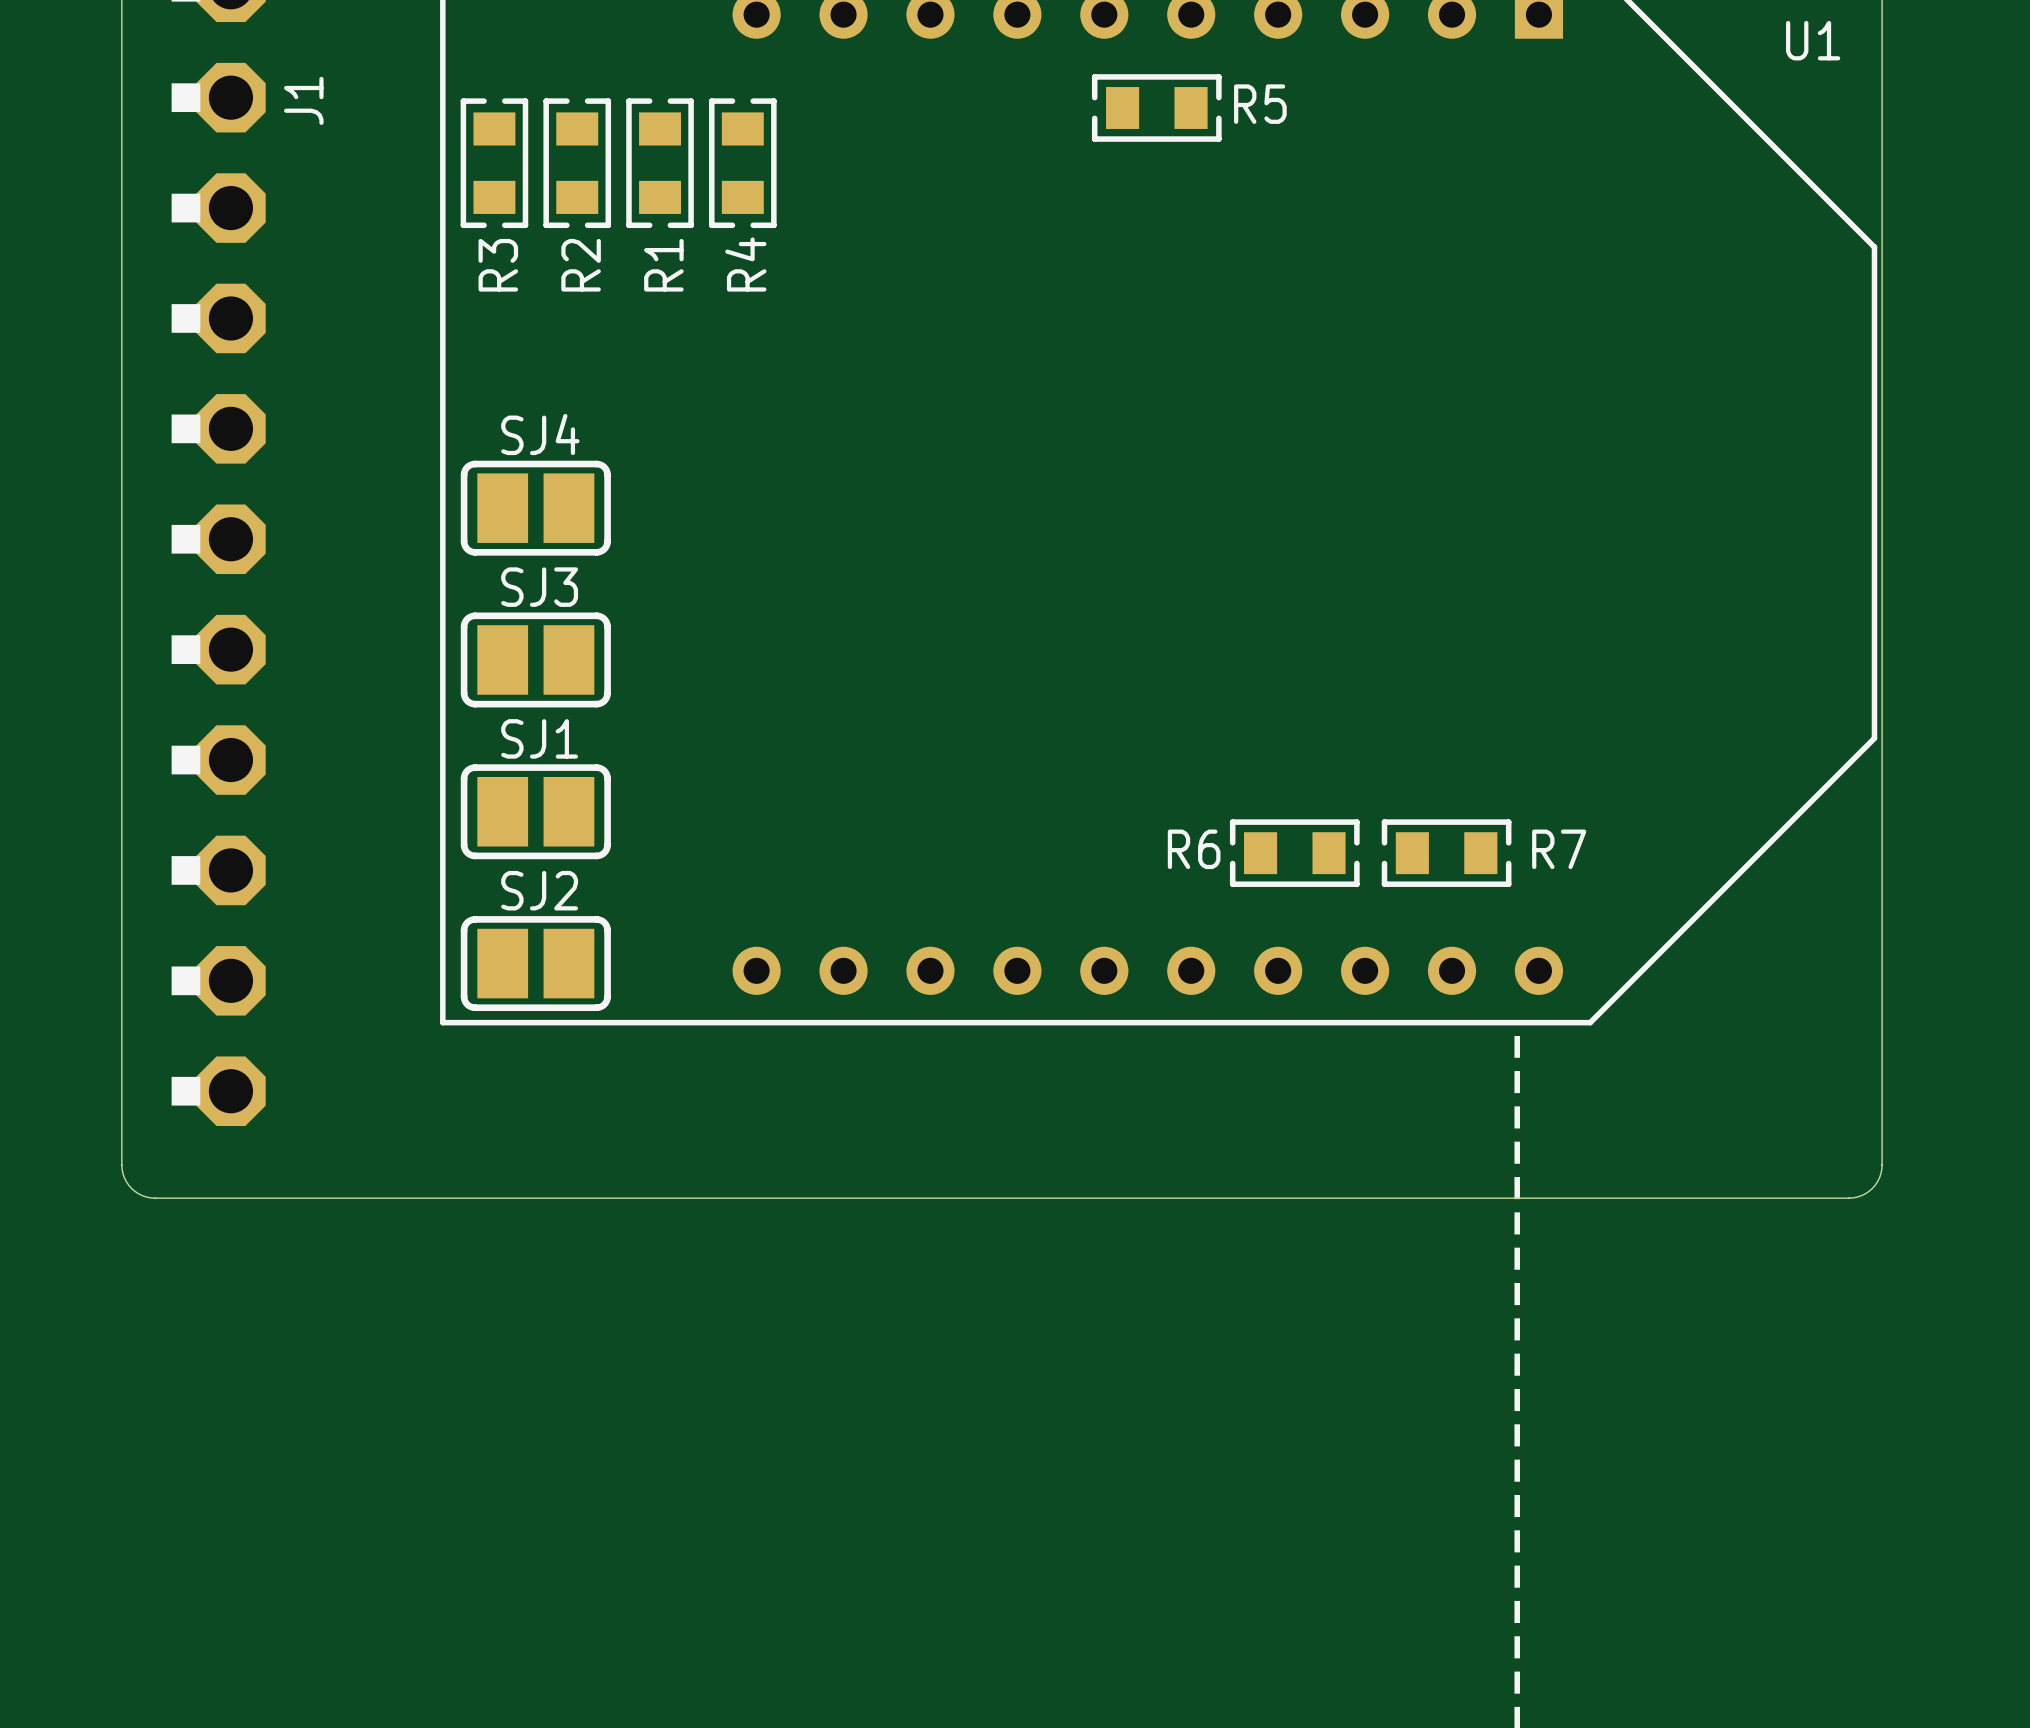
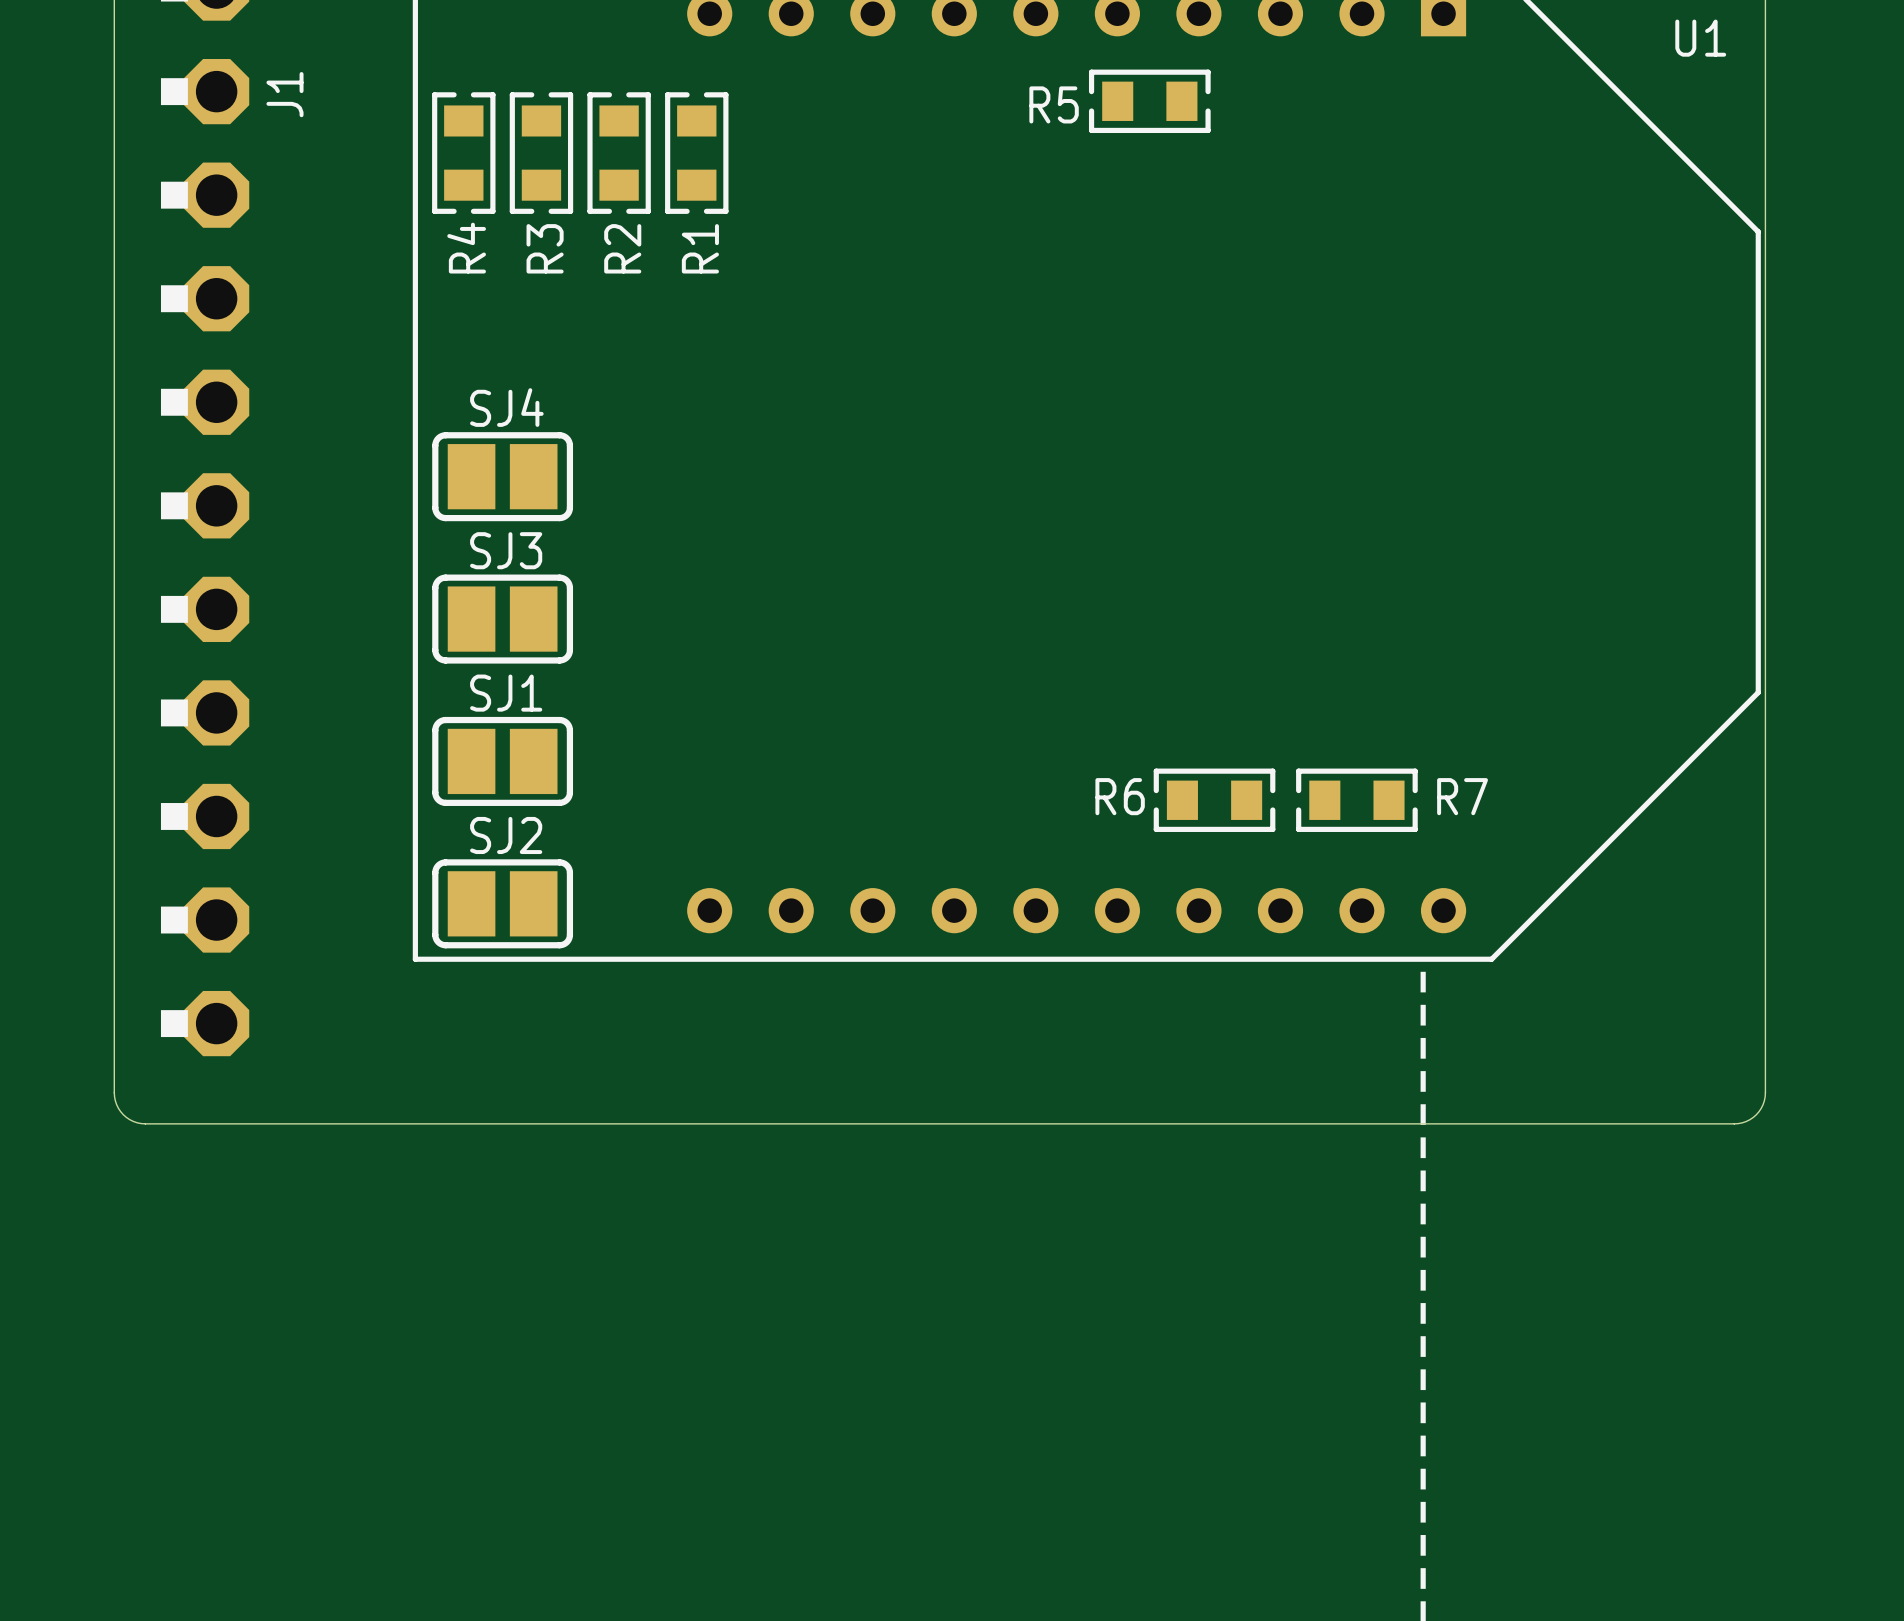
R5 name position: R5 (1260, 104) -> R5 (1054, 104)
R5 position: (1156, 107) -> (1149, 101)
R4 name: R4 (745, 264) -> R1 (700, 248)
R3 name: R3 (498, 265) -> R4 (466, 248)
R2 name: R2 (581, 265) -> R3 (545, 248)
R1 name: R1 (663, 265) -> R2 (622, 248)

